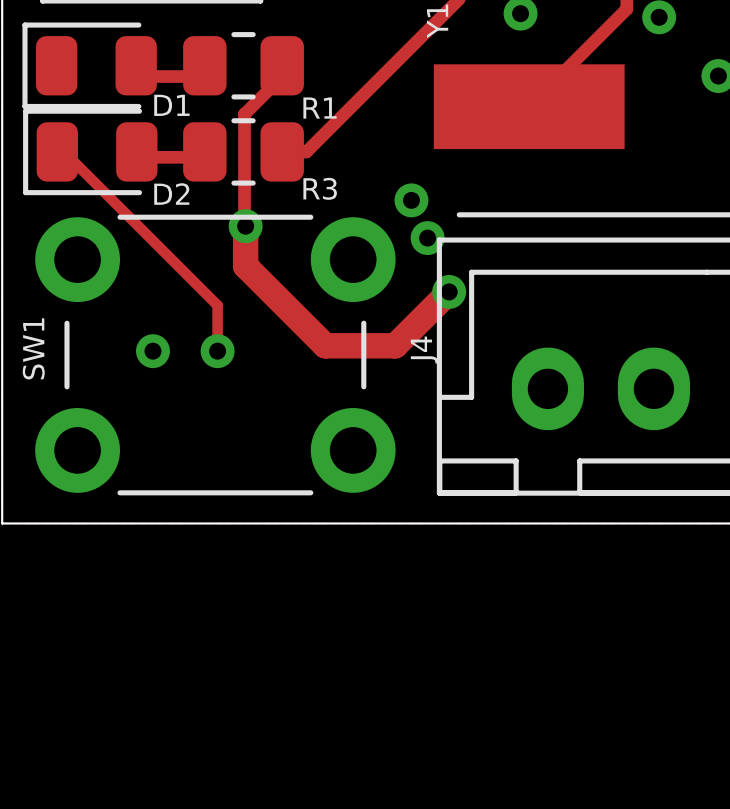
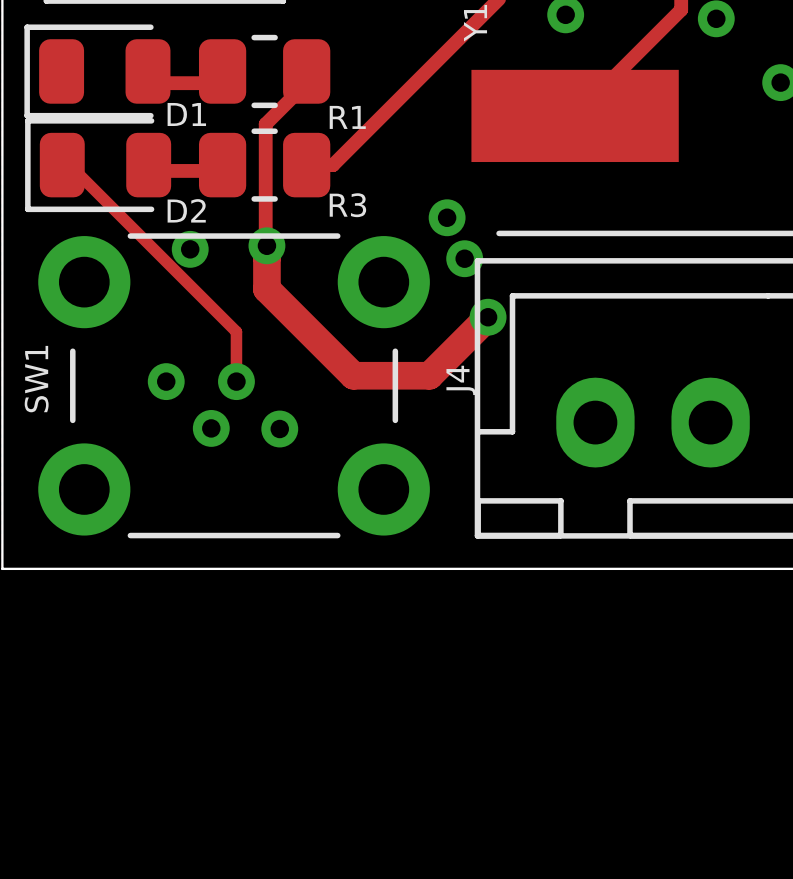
via: none -> (190, 249)
via: none -> (211, 428)
via: none -> (279, 429)

